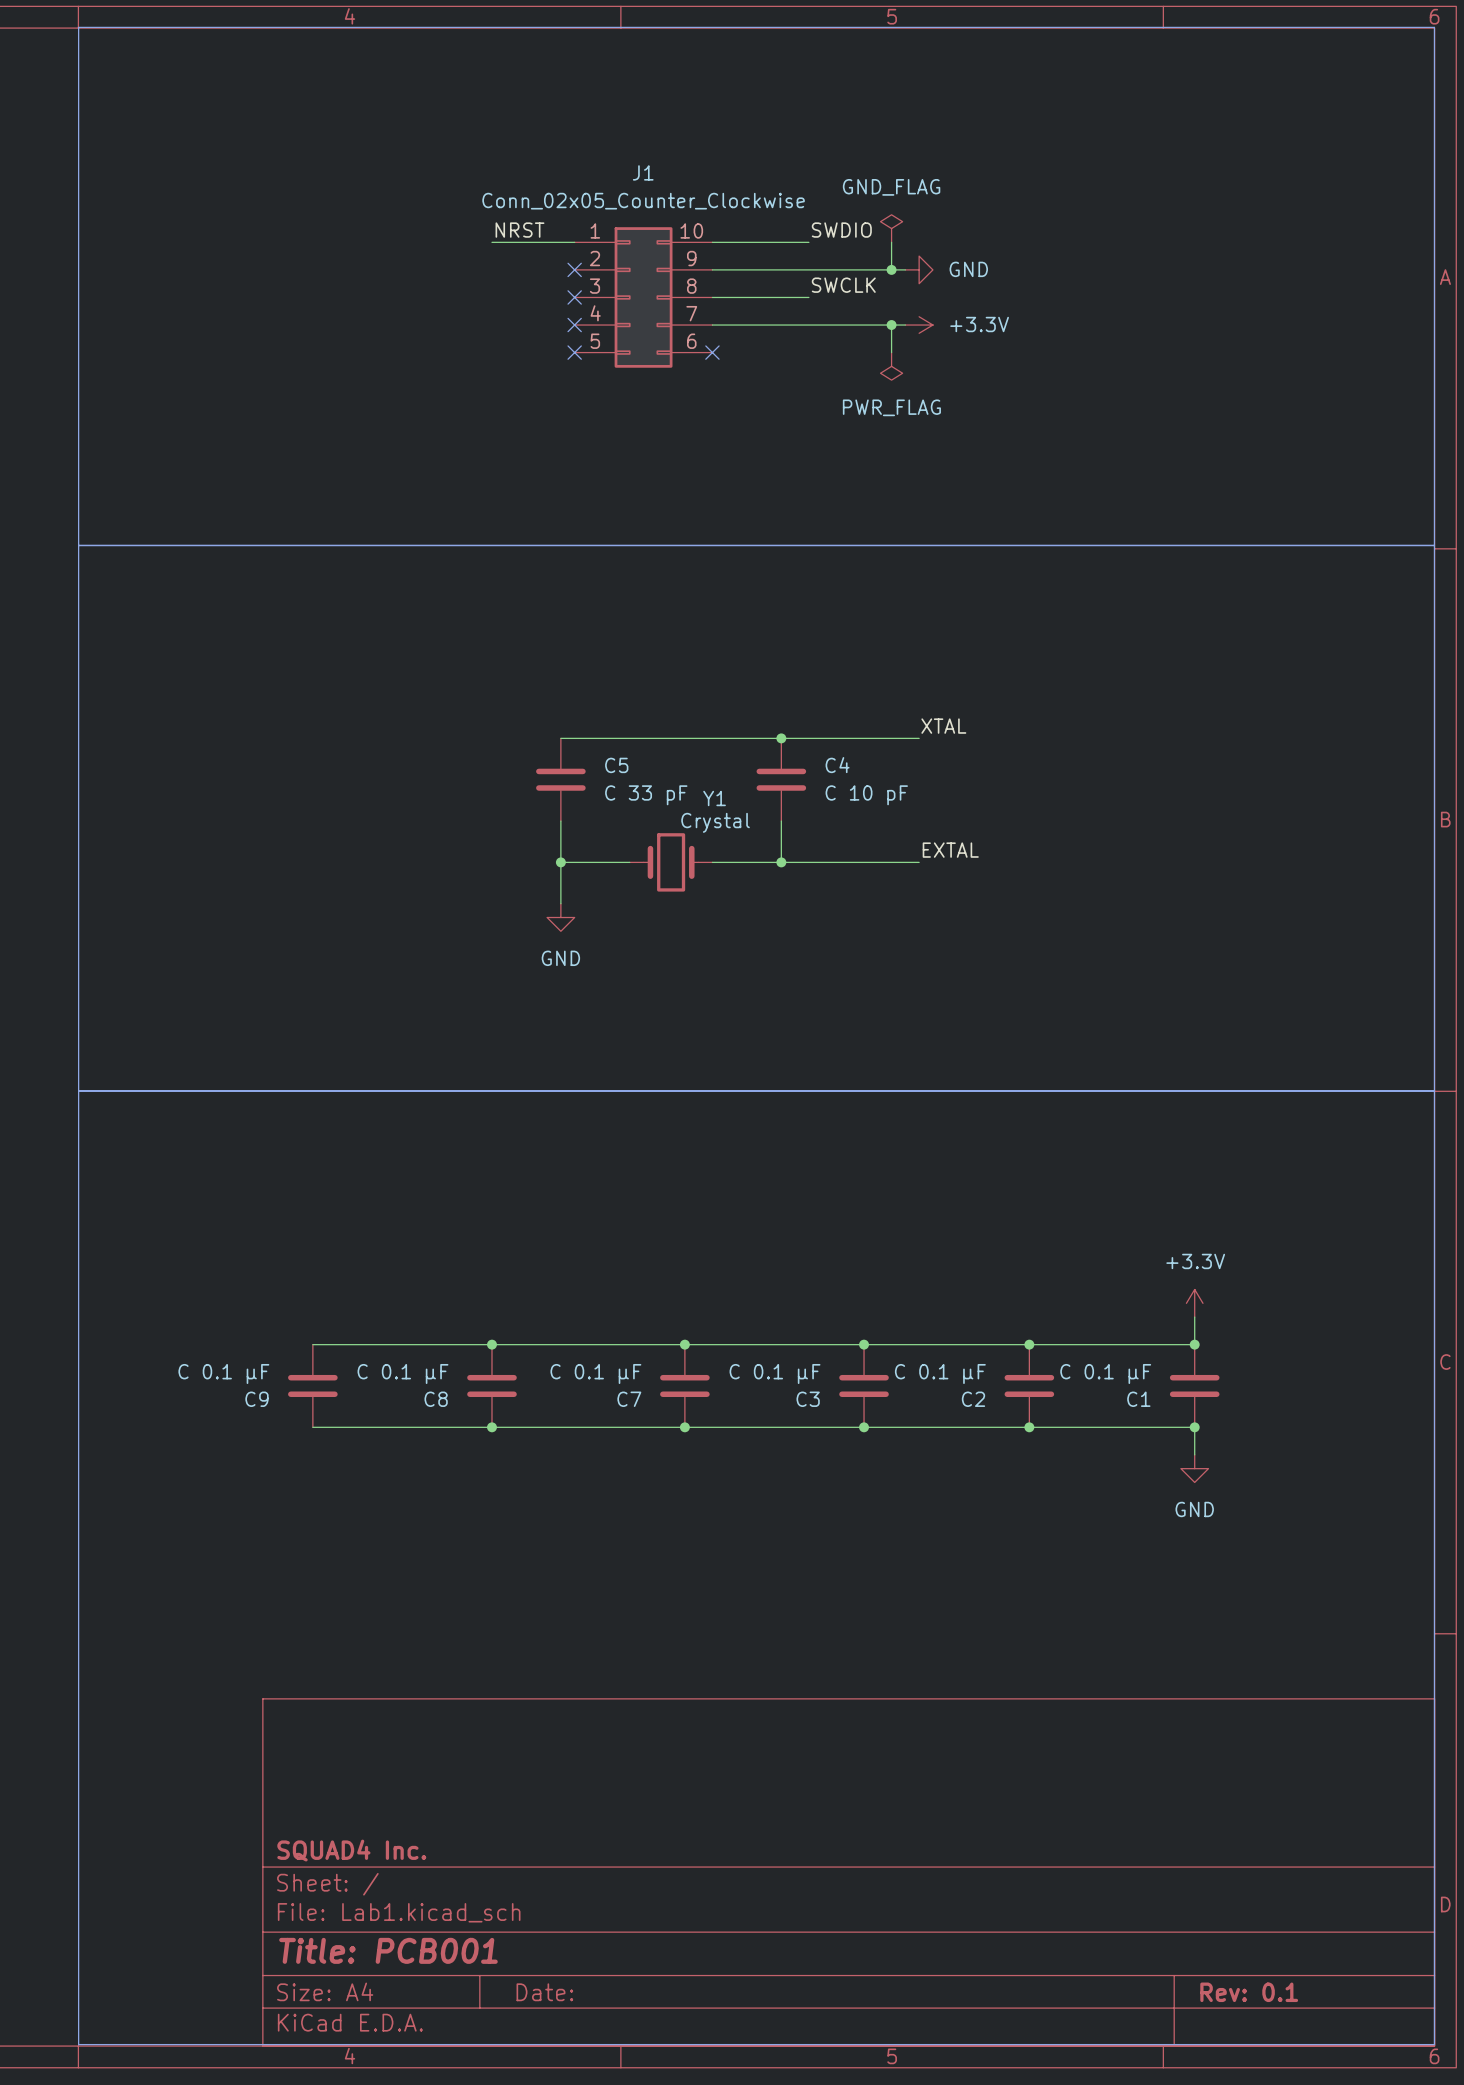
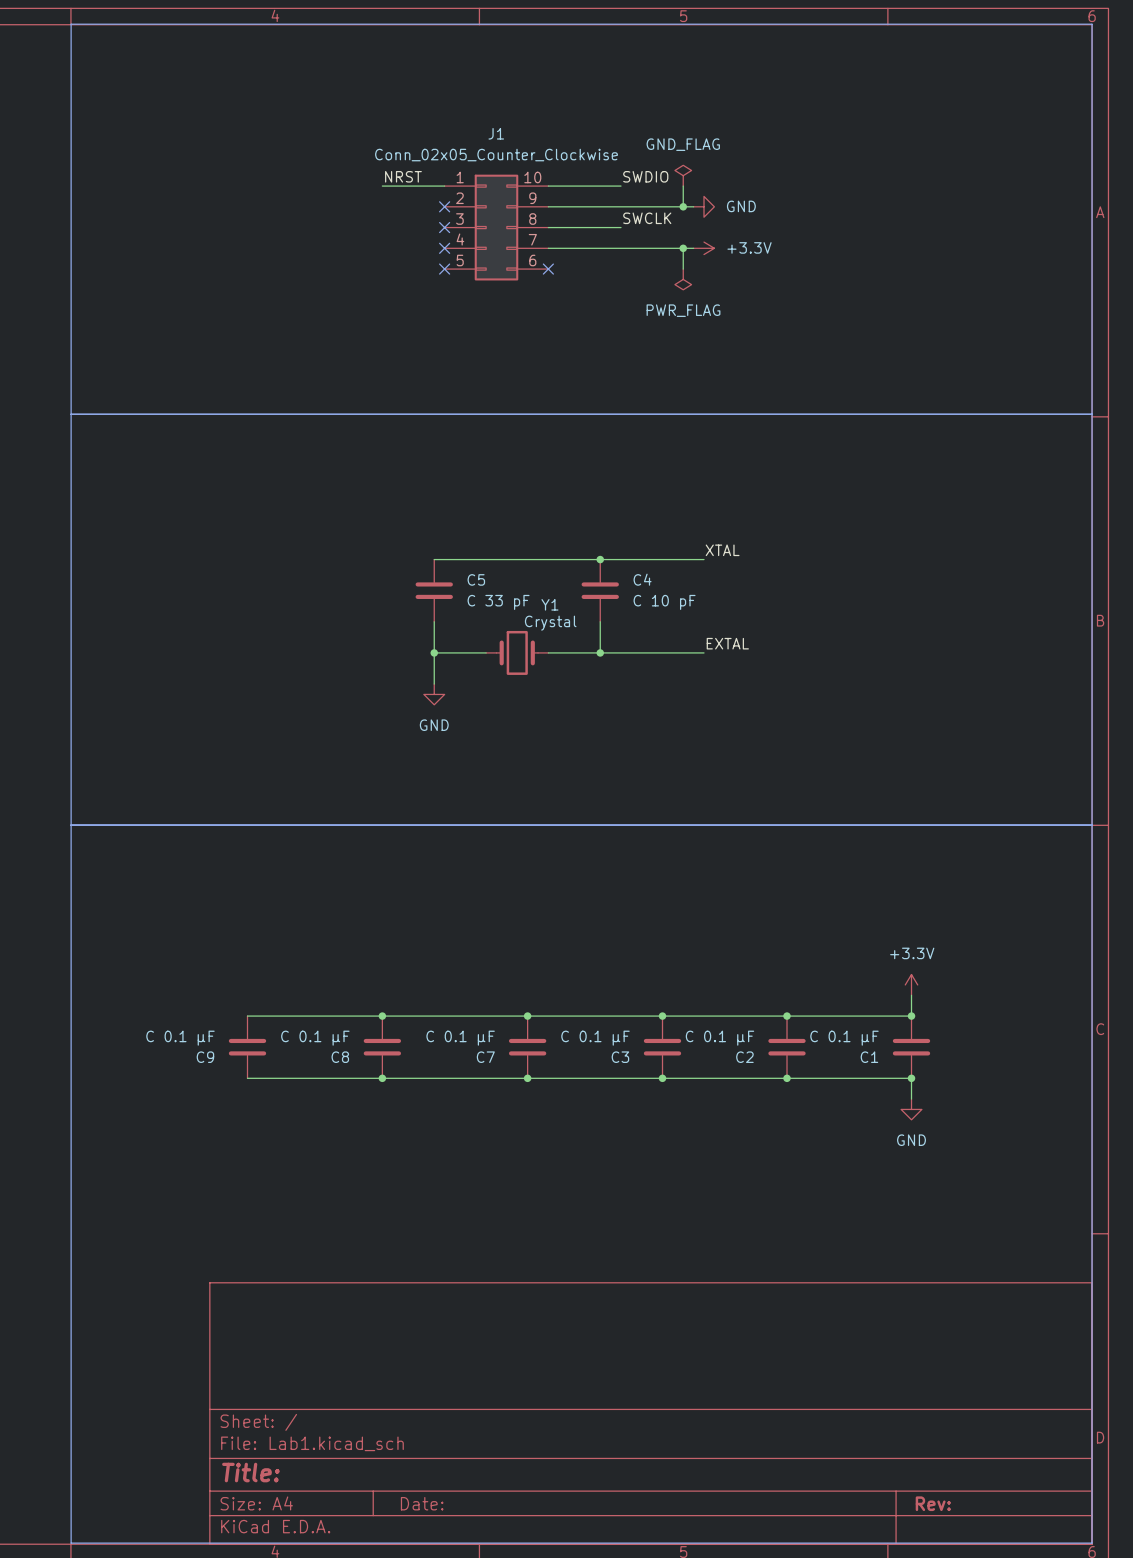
title block: SQUAD4 Inc. (351, 1850) -> none
title block: Title: PCB001 (388, 1950) -> Title: (250, 1472)
title block: Rev: 0.1 (1249, 1992) -> Rev: (933, 1503)

